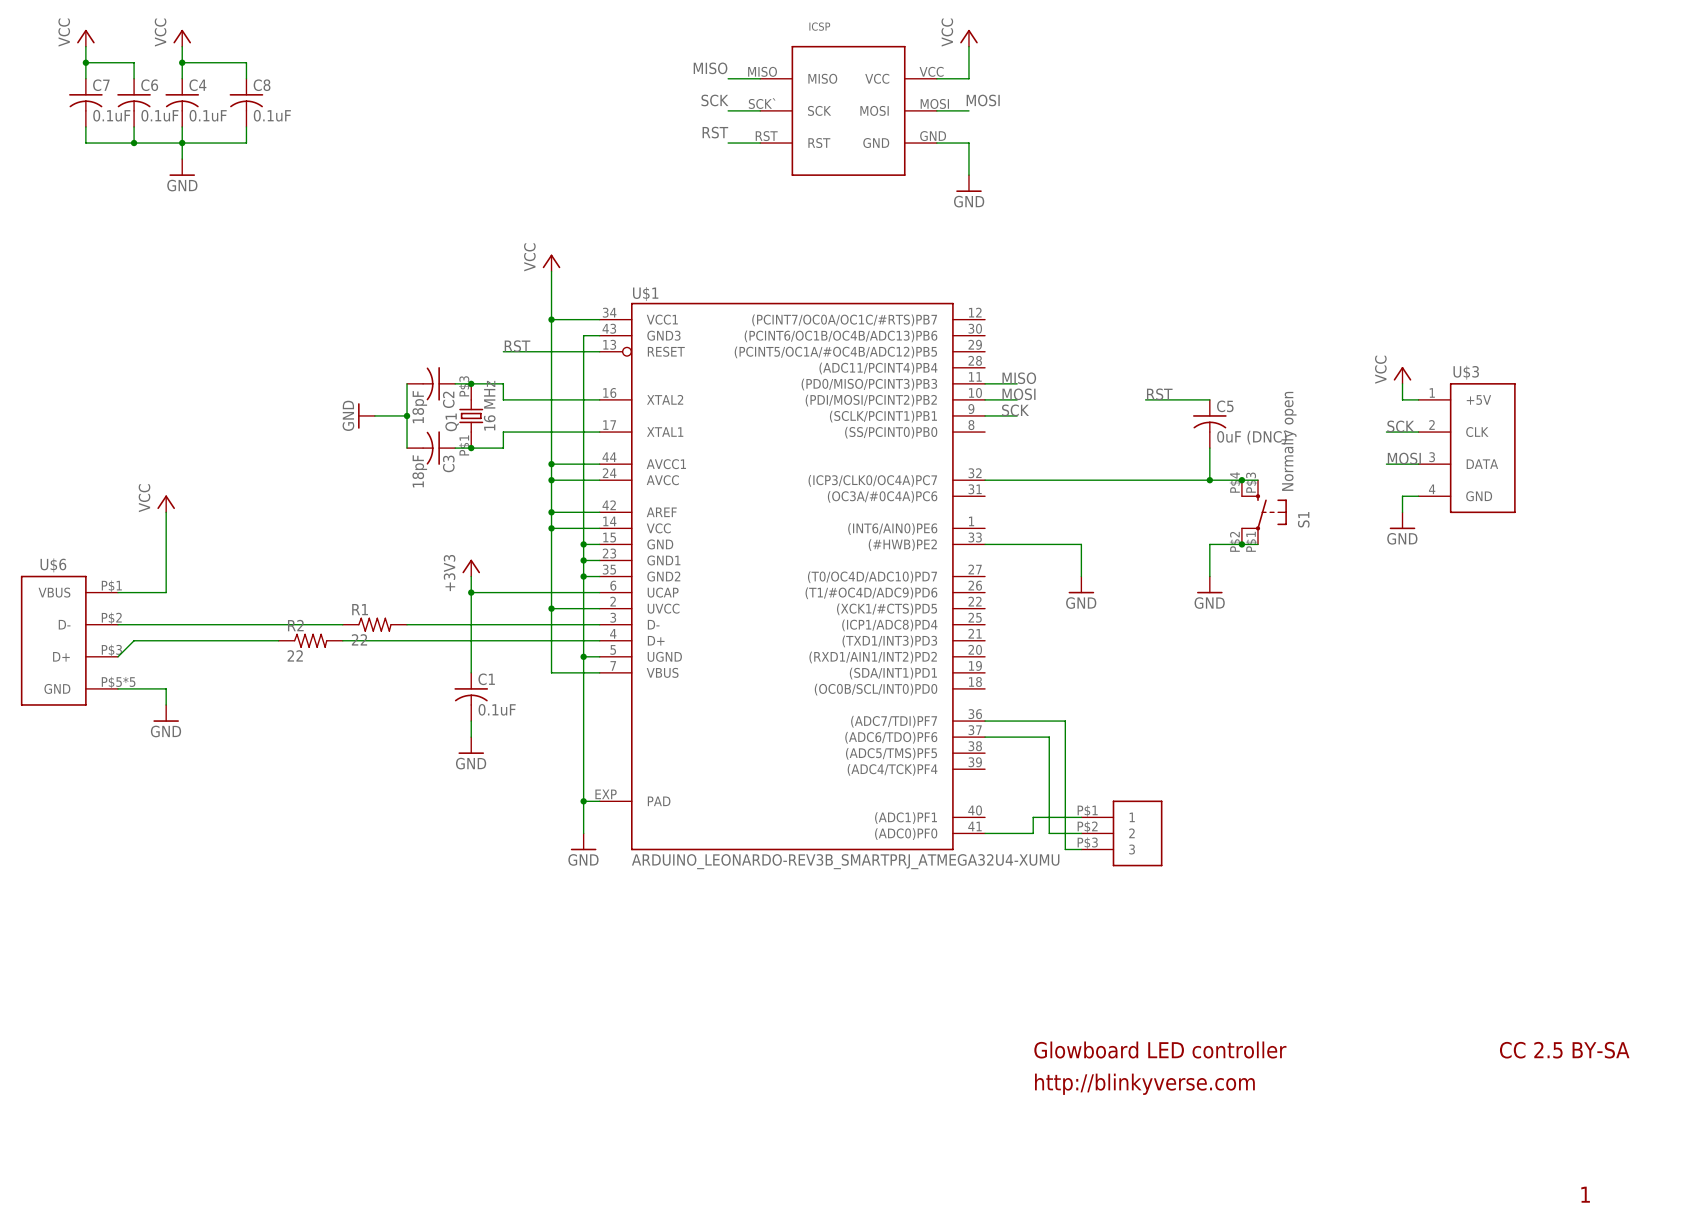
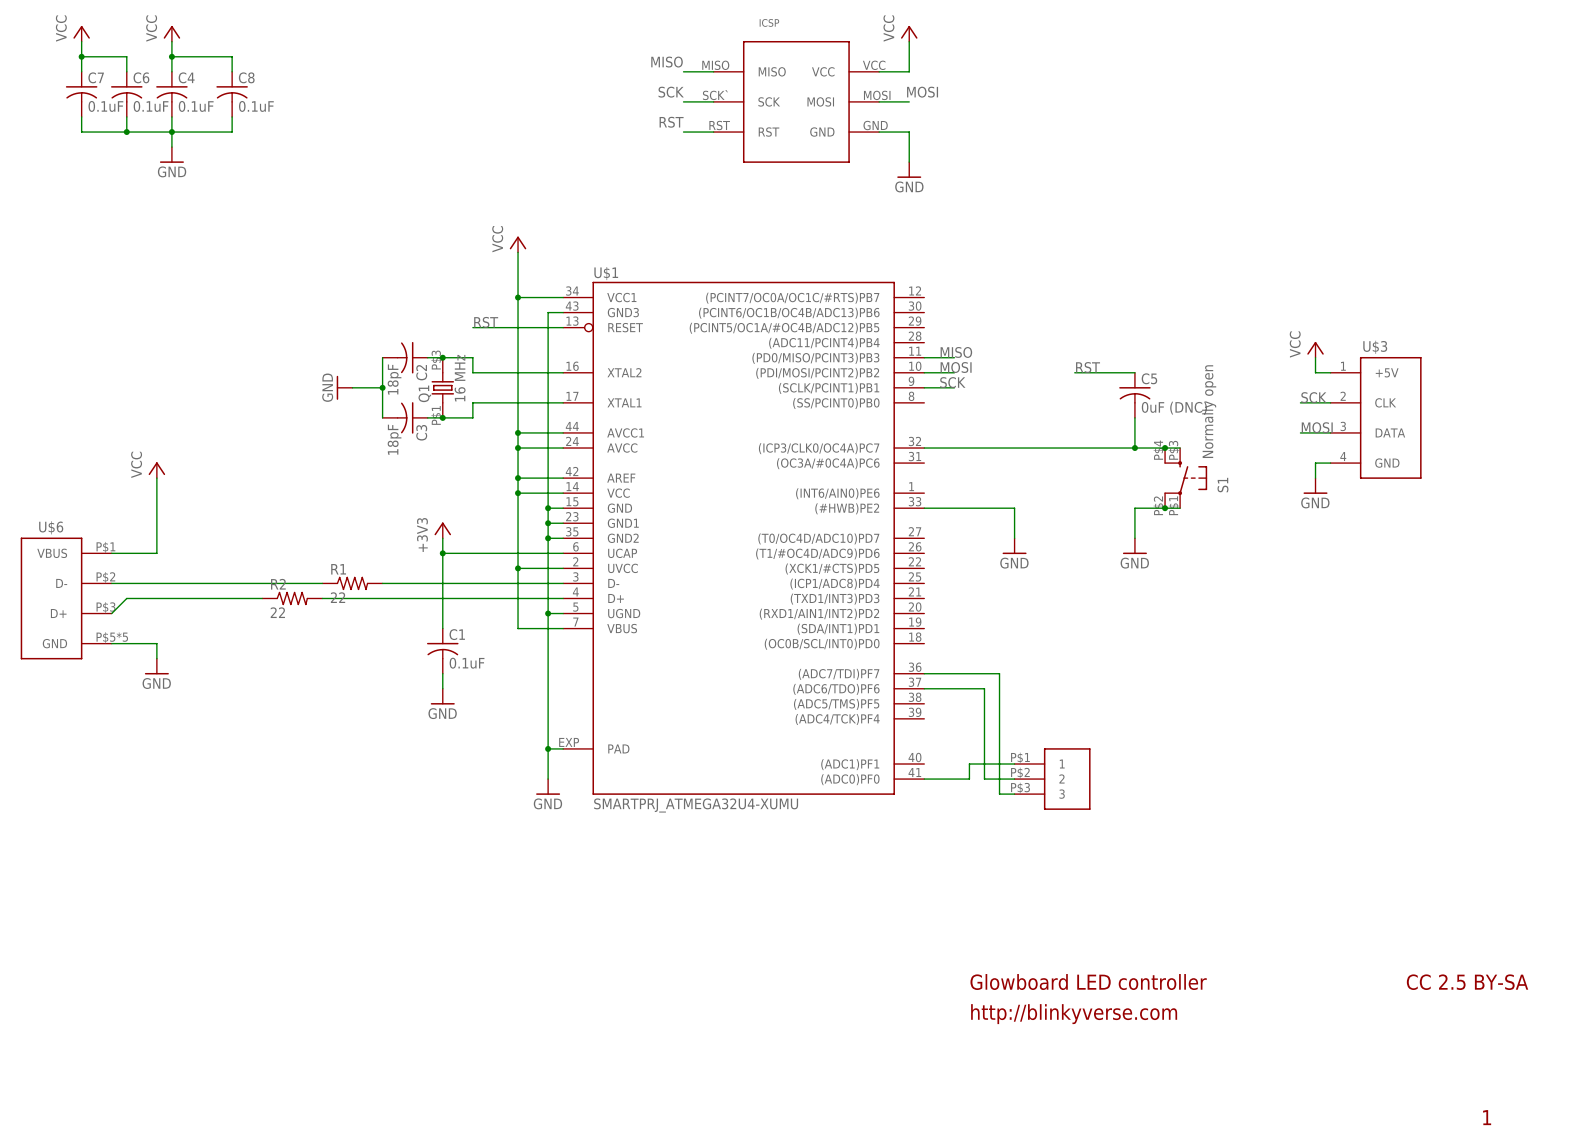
U$1 value: ARDUINO_LEONARDO-REV3B_SMARTPRJ_ATMEGA32U4-XUMU (845, 861) -> SMARTPRJ_ATMEGA32U4-XUMU (696, 805)

